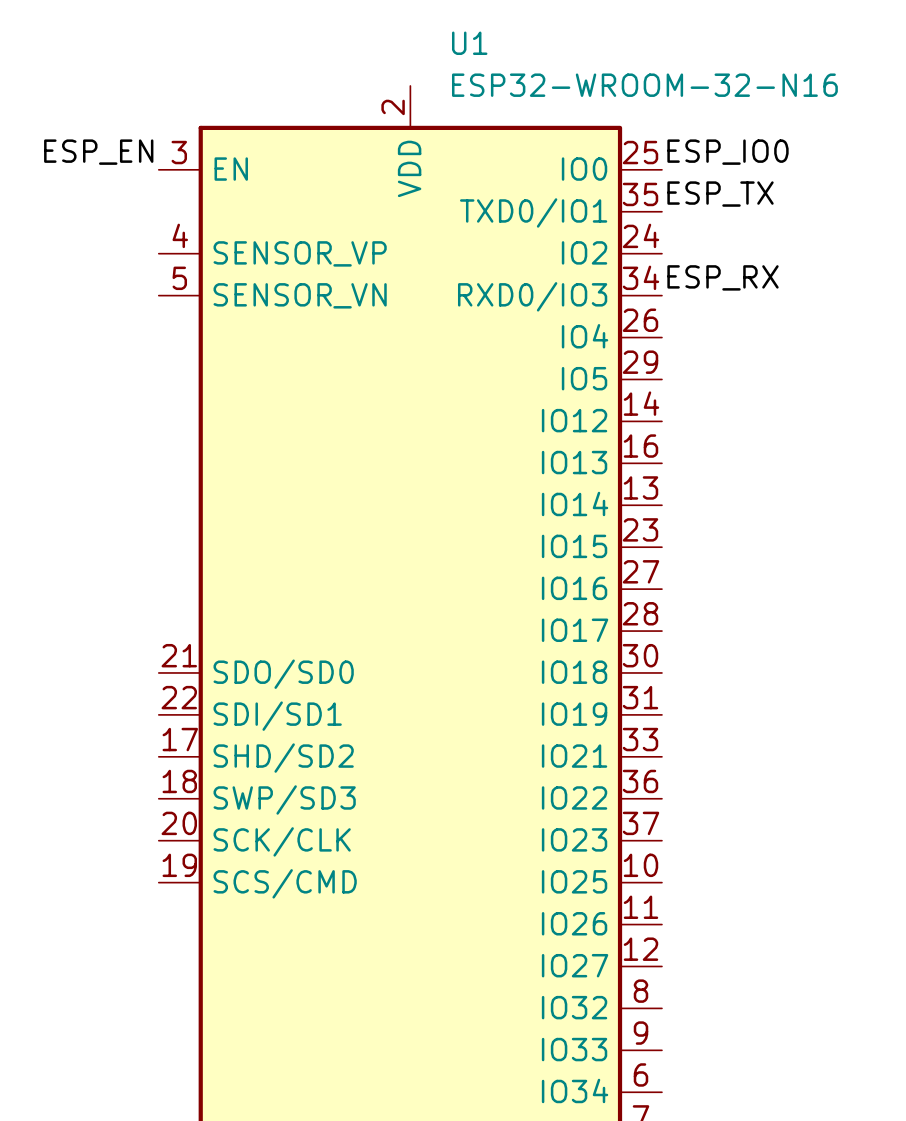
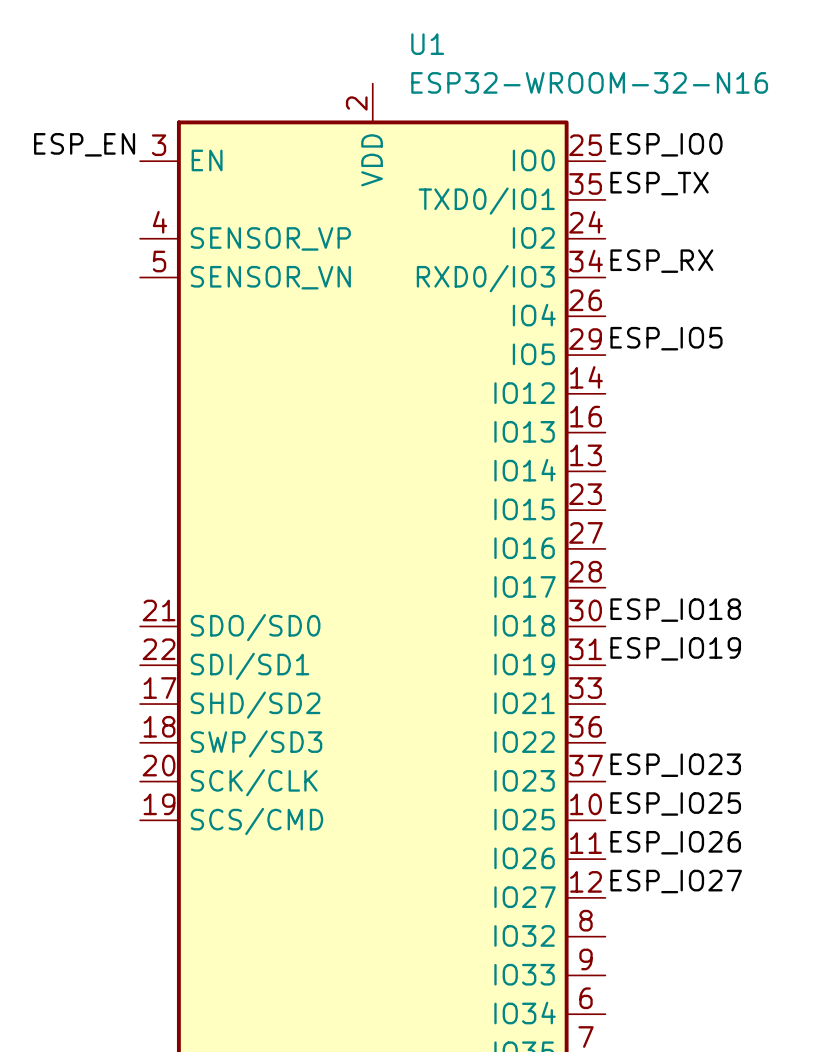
label: none -> ESP_IO5 (666, 338)
label: none -> ESP_IO18 (675, 610)
label: none -> ESP_IO19 (675, 648)
label: none -> ESP_IO23 (675, 765)
label: none -> ESP_IO25 (675, 803)
label: none -> ESP_IO26 (675, 842)
label: none -> ESP_IO27 (676, 881)

